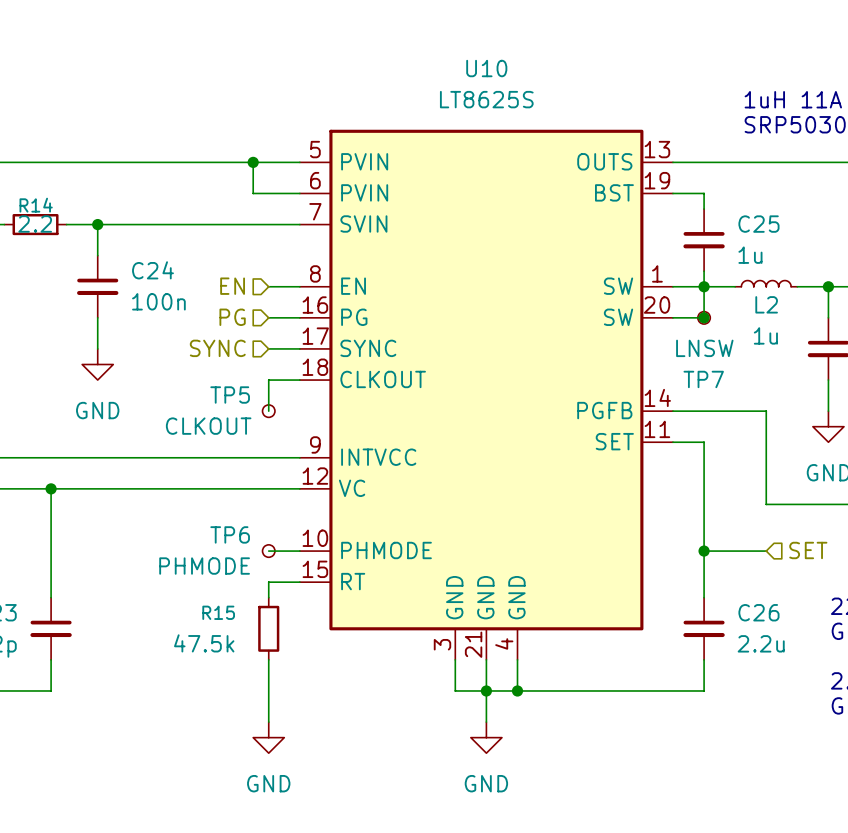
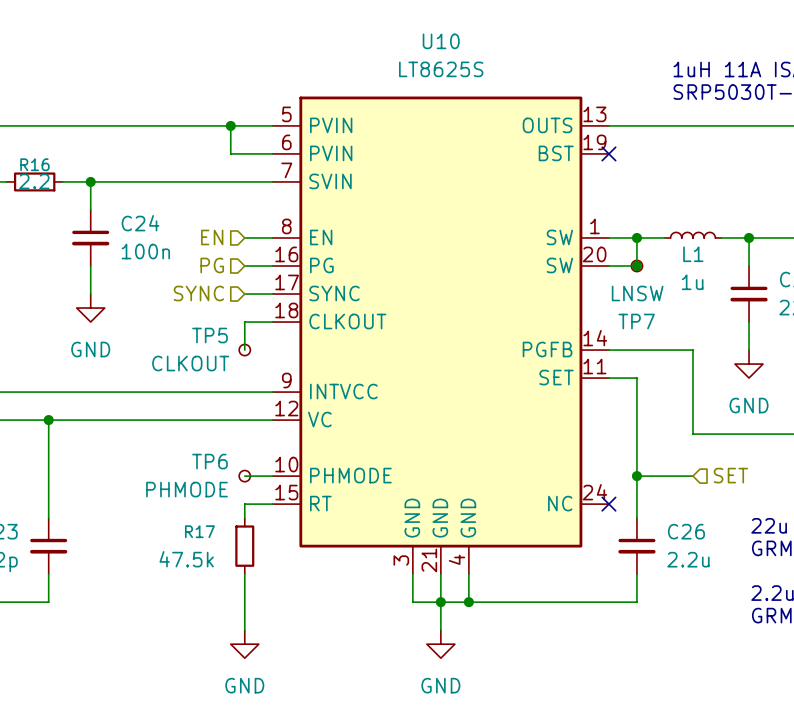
U10 symbol: [299, 129, 673, 660] -> [272, 96, 609, 575]
wire: (672, 193) (704, 193) (704, 209) -> none
no-connect mark: none -> (608, 153)
R14 name: R14 (36, 205) -> R16 (34, 164)
C25: 1u (704, 240) -> none
wire: (704, 271) (704, 286) -> none
L2 name: L2 (766, 304) -> L1 (693, 254)
no-connect mark: none -> (608, 504)
R15 name: R15 (218, 612) -> R17 (199, 531)

